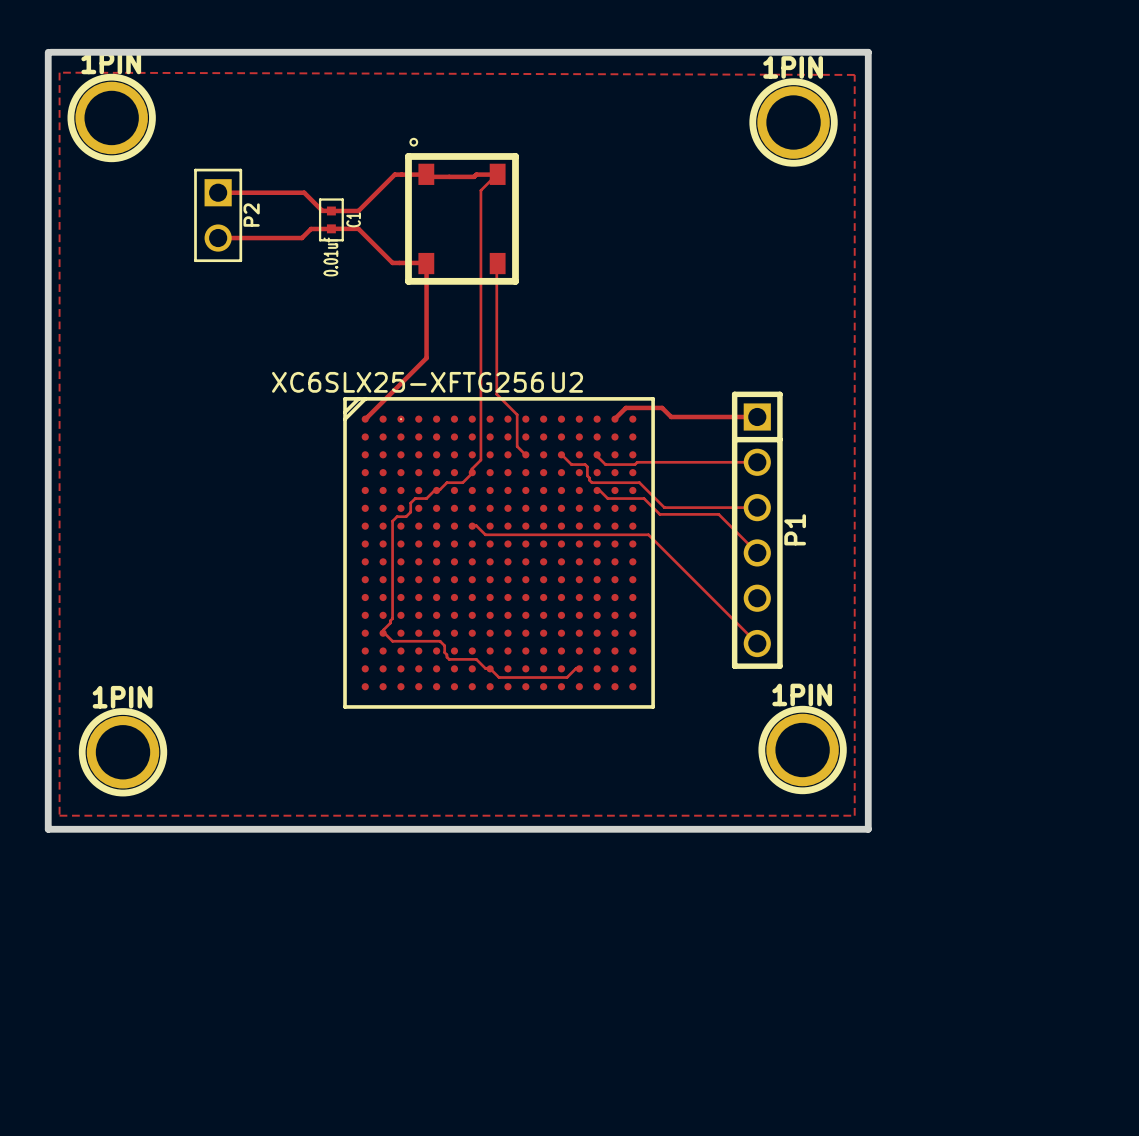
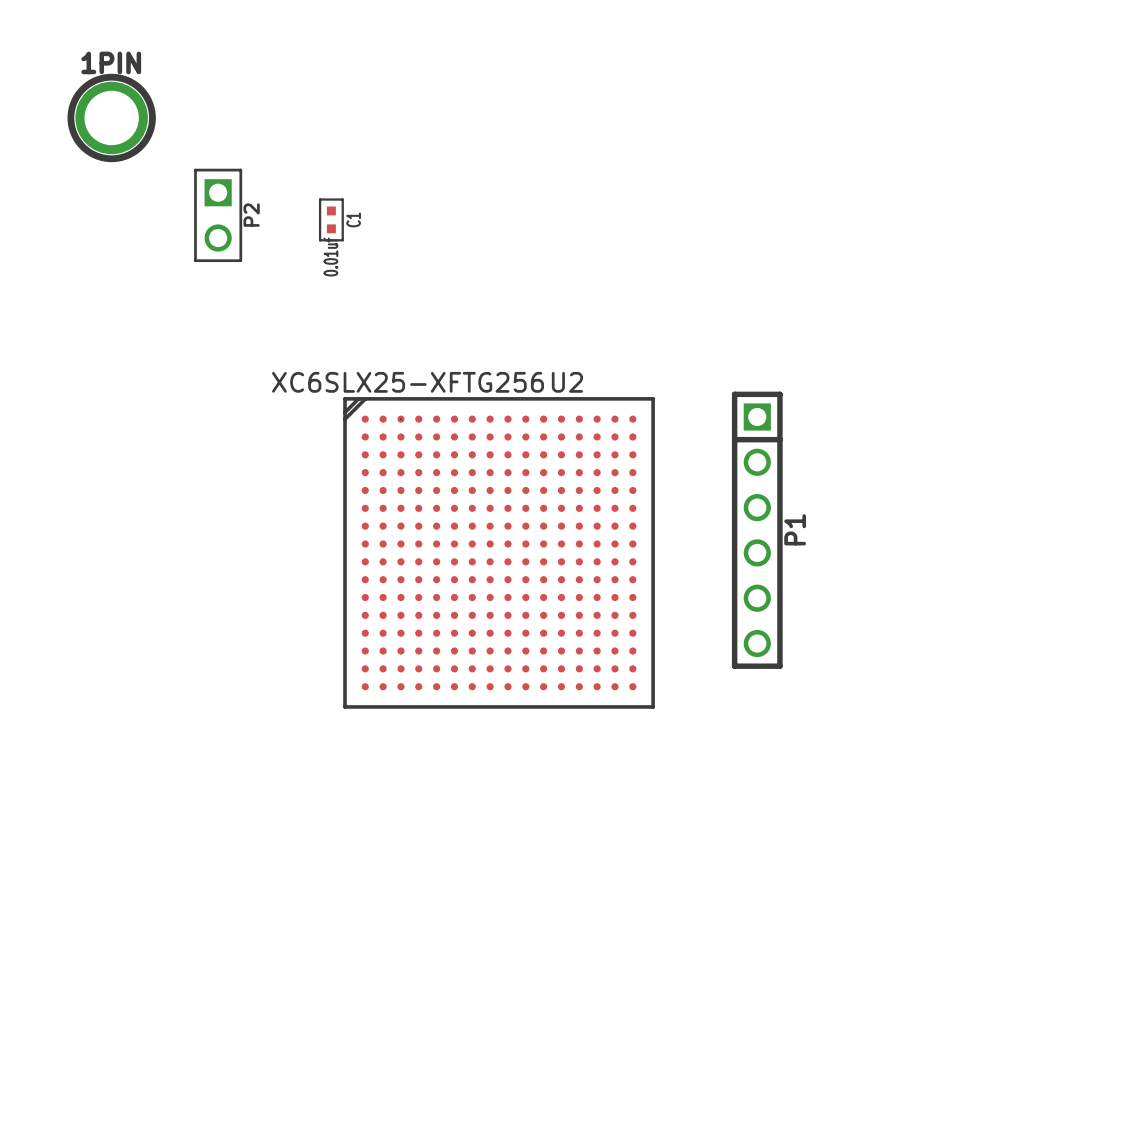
board edge: (48, 52) (48, 829) (868, 829) (868, 52) (50, 52) -> none
top zone outline: (59, 72) (854, 74) (854, 815) (59, 815) (59, 72) -> none
1PIN: (793, 122) -> none
top track: (496, 174) (480, 190) (480, 460) (471, 469) (471, 473) -> none
top track: (496, 174) (476, 174) (474, 176) (394, 174) (358, 210) (322, 210) (304, 192) (218, 192) -> none
part: (461, 211) -> none
top track: (331, 228) (358, 228) (392, 262) (426, 262) -> none
top track: (331, 228) (311, 228) (301, 238) (218, 238) -> none
top track: (426, 262) (426, 358) (365, 419) -> none
top track: (497, 263) (496, 394) (517, 414) (517, 446) (525, 454) -> none
top track: (757, 417) (671, 417) (662, 407) (625, 407) (614, 419) -> none
top track: (561, 454) (571, 464) (585, 464) (587, 466) (587, 475) (591, 482) (639, 482) (664, 507) (757, 507) -> none
top track: (597, 454) (605, 464) (634, 464) (637, 462) (757, 462) -> none
top track: (471, 473) (462, 482) (446, 482) (440, 489) (435, 489) (426, 498) (415, 498) (410, 503) (410, 512) (406, 516) (397, 516) (392, 521) (392, 618) (383, 632) -> none
top track: (597, 490) (598, 489) (607, 498) (644, 498) (659, 514) (718, 514) (757, 552) -> none
top track: (472, 526) (476, 525) (485, 534) (648, 534) (757, 643) -> none
top track: (383, 632) (392, 641) (440, 641) (444, 645) (444, 652) (449, 659) (476, 659) (485, 668) (489, 668) -> none
top track: (489, 668) (499, 677) (567, 677) (576, 668) (579, 668) -> none
1PIN: (802, 750) -> none
1PIN: (123, 752) -> none

